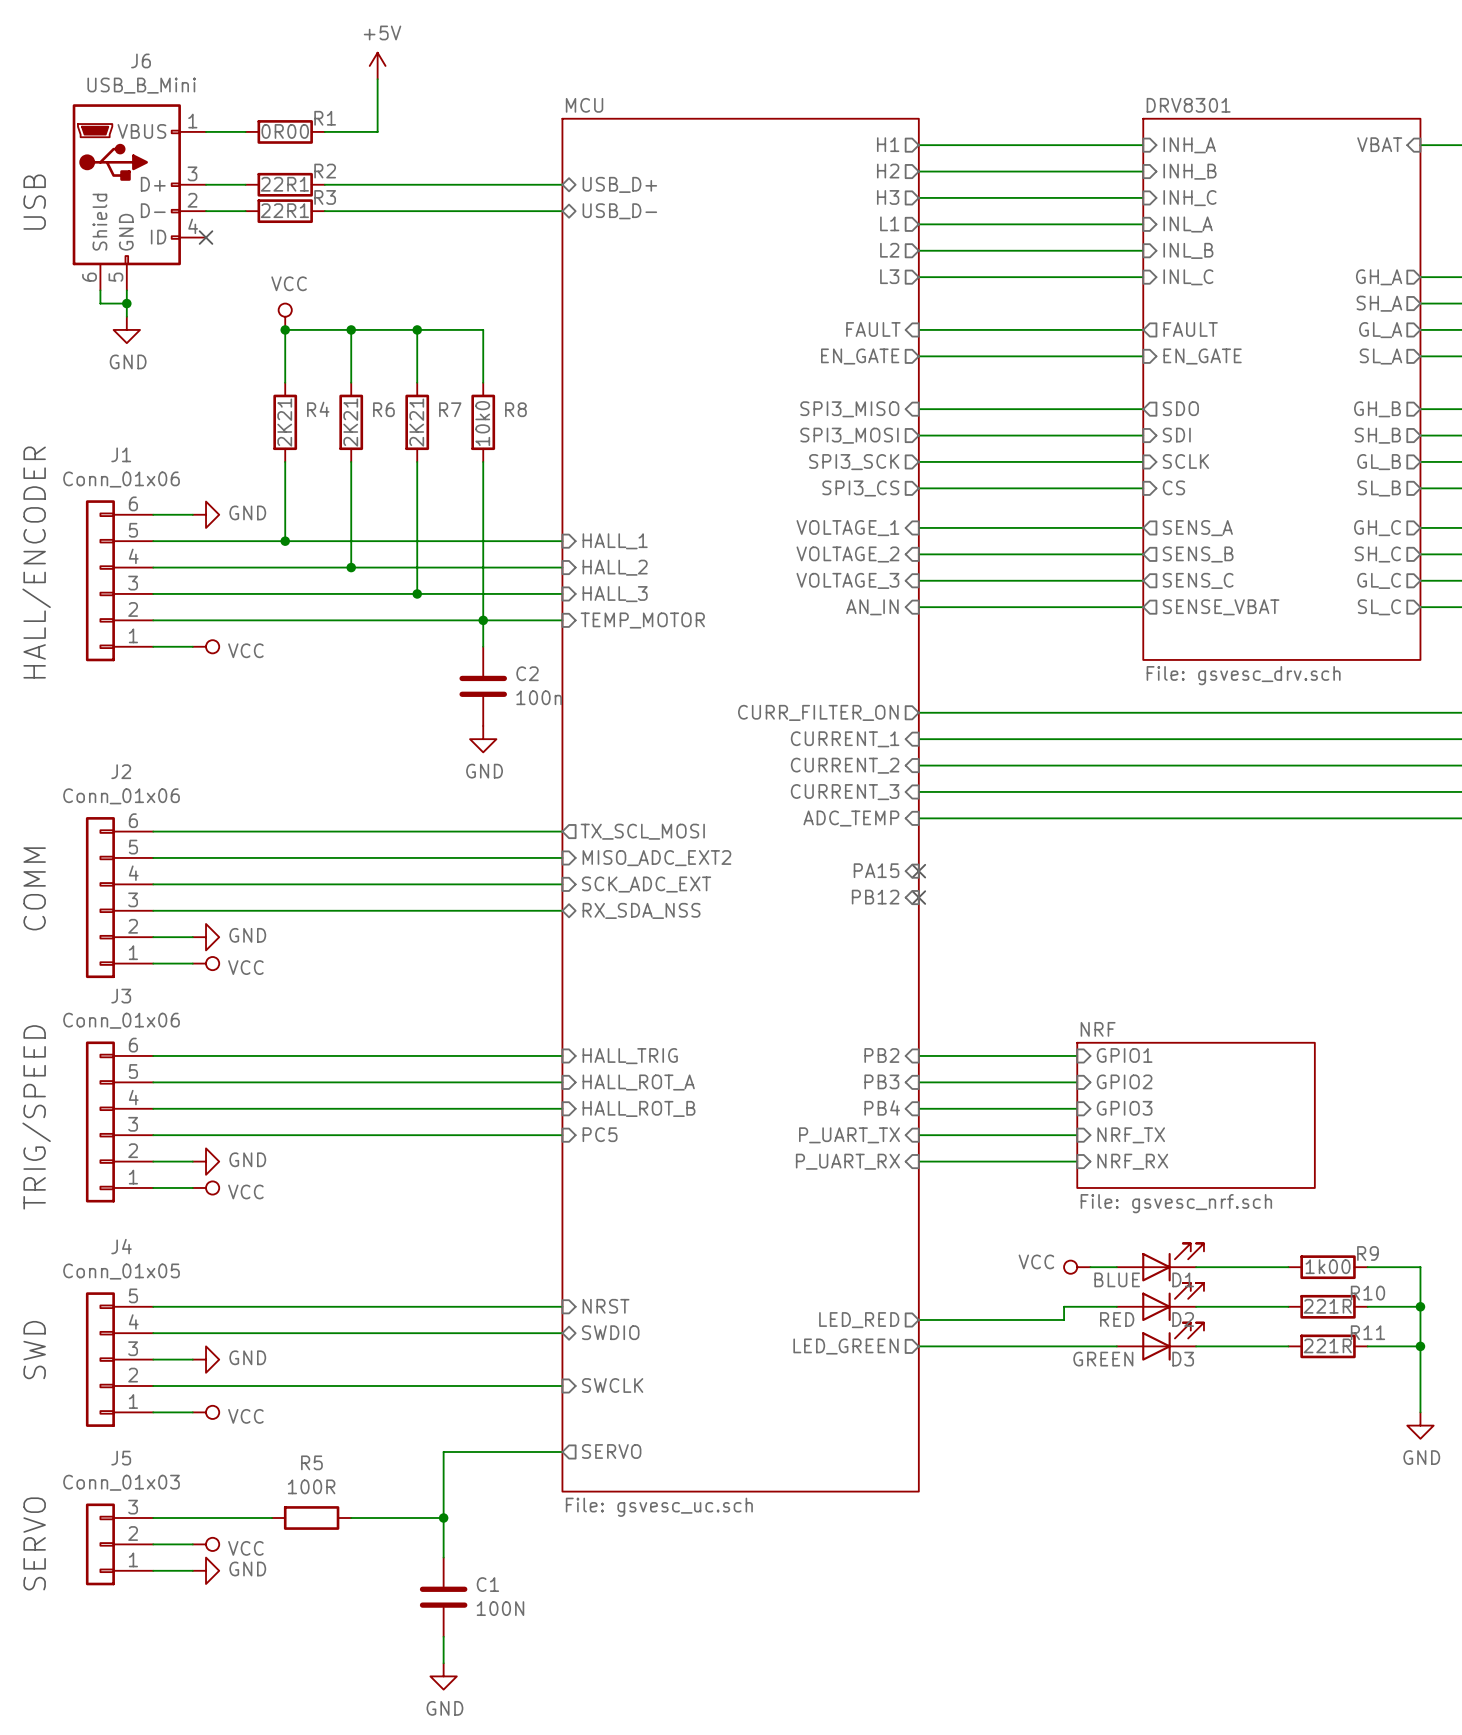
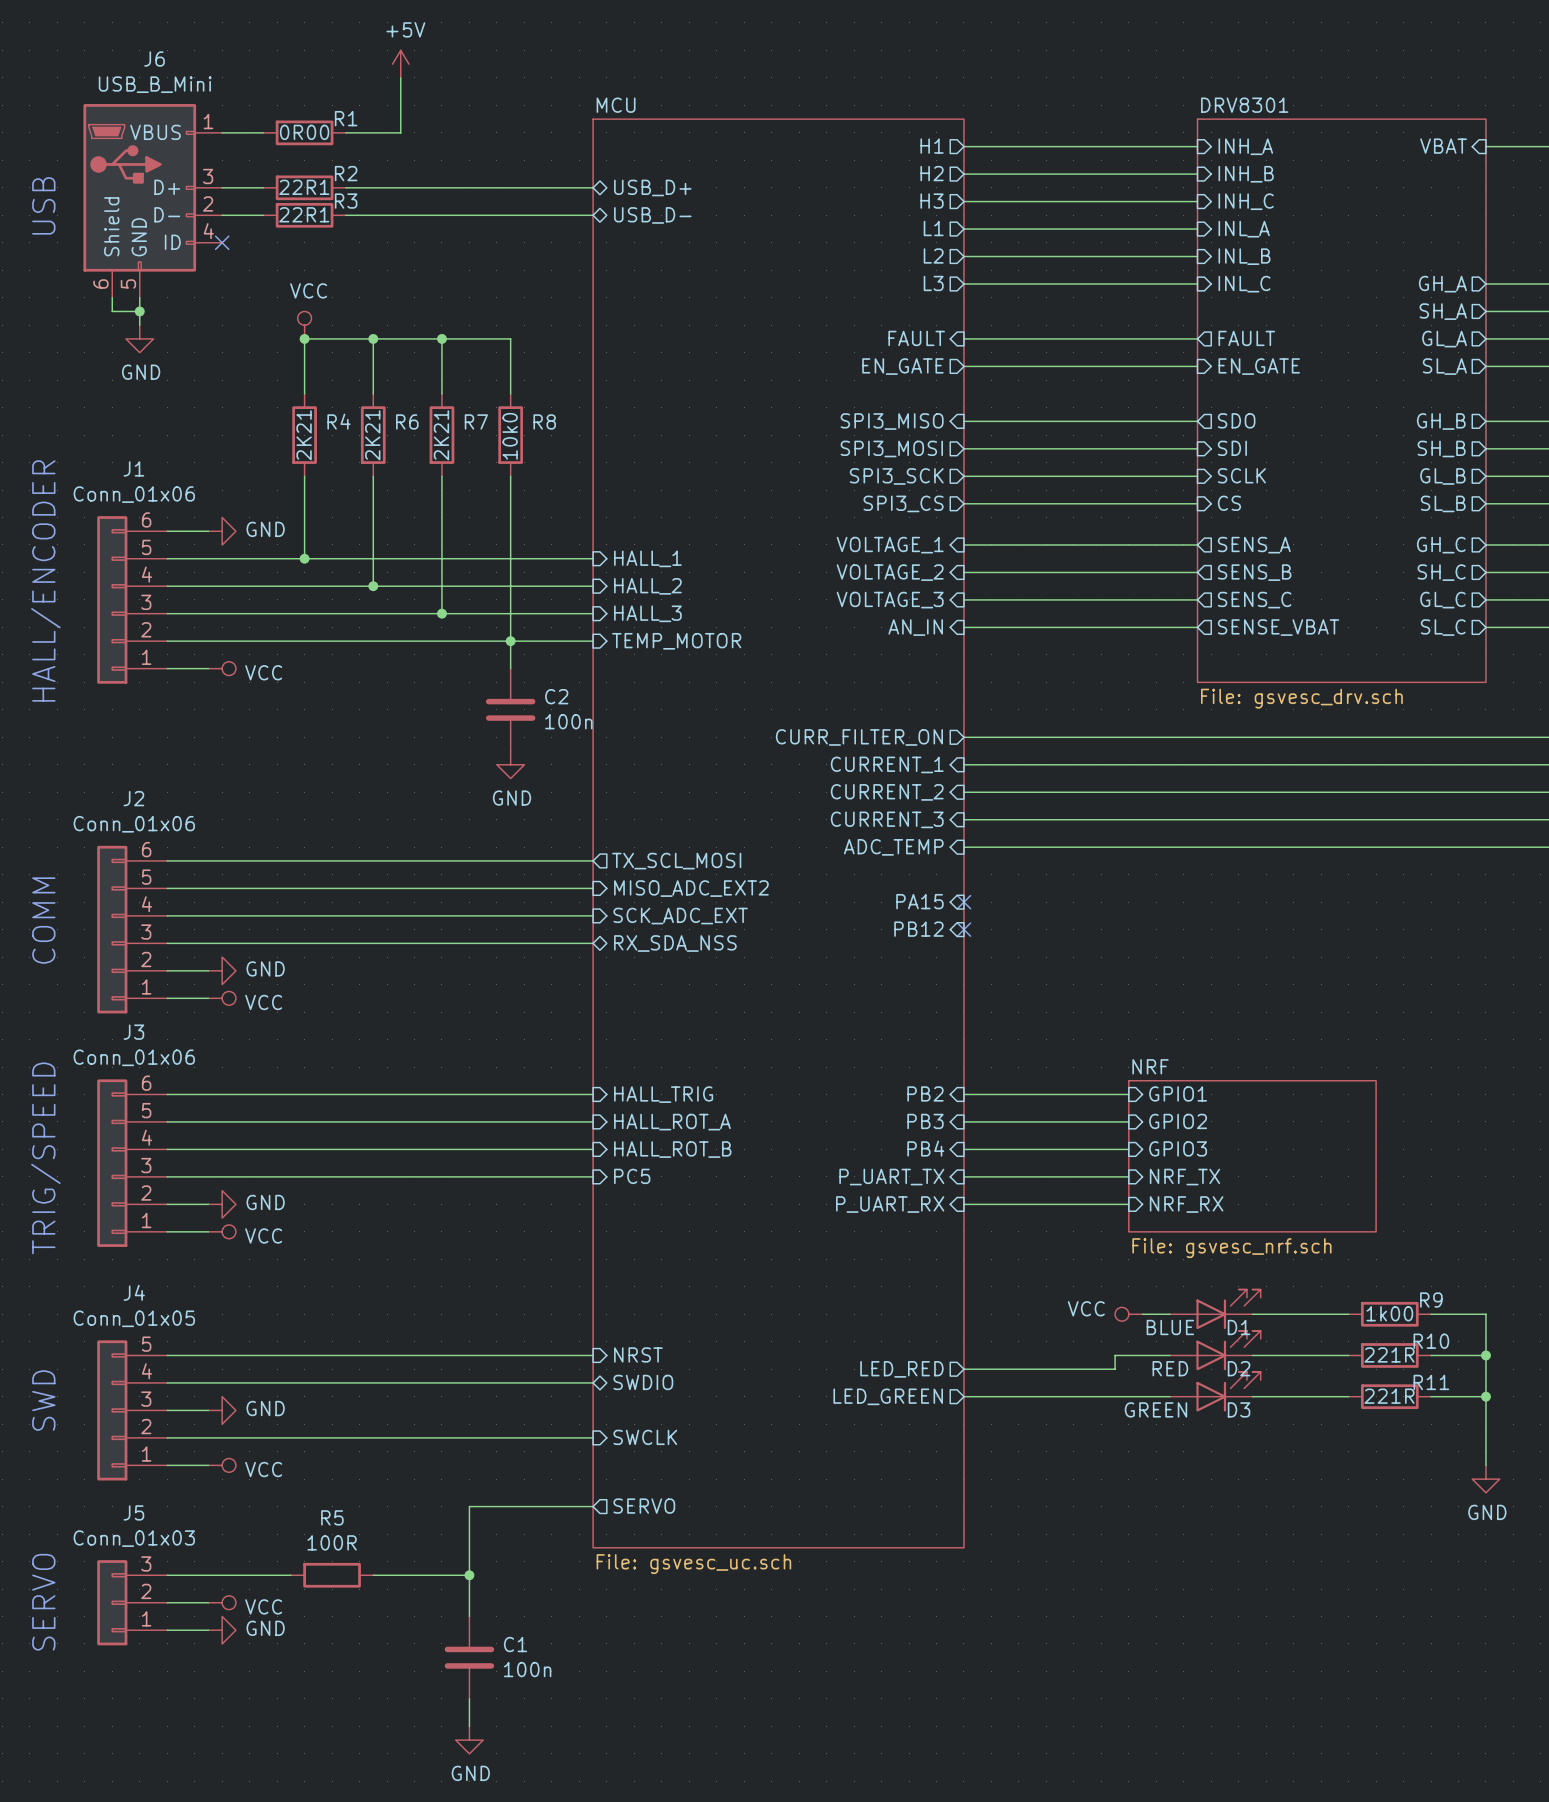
C1 value: 100N (500, 1608) -> 100n (527, 1669)

